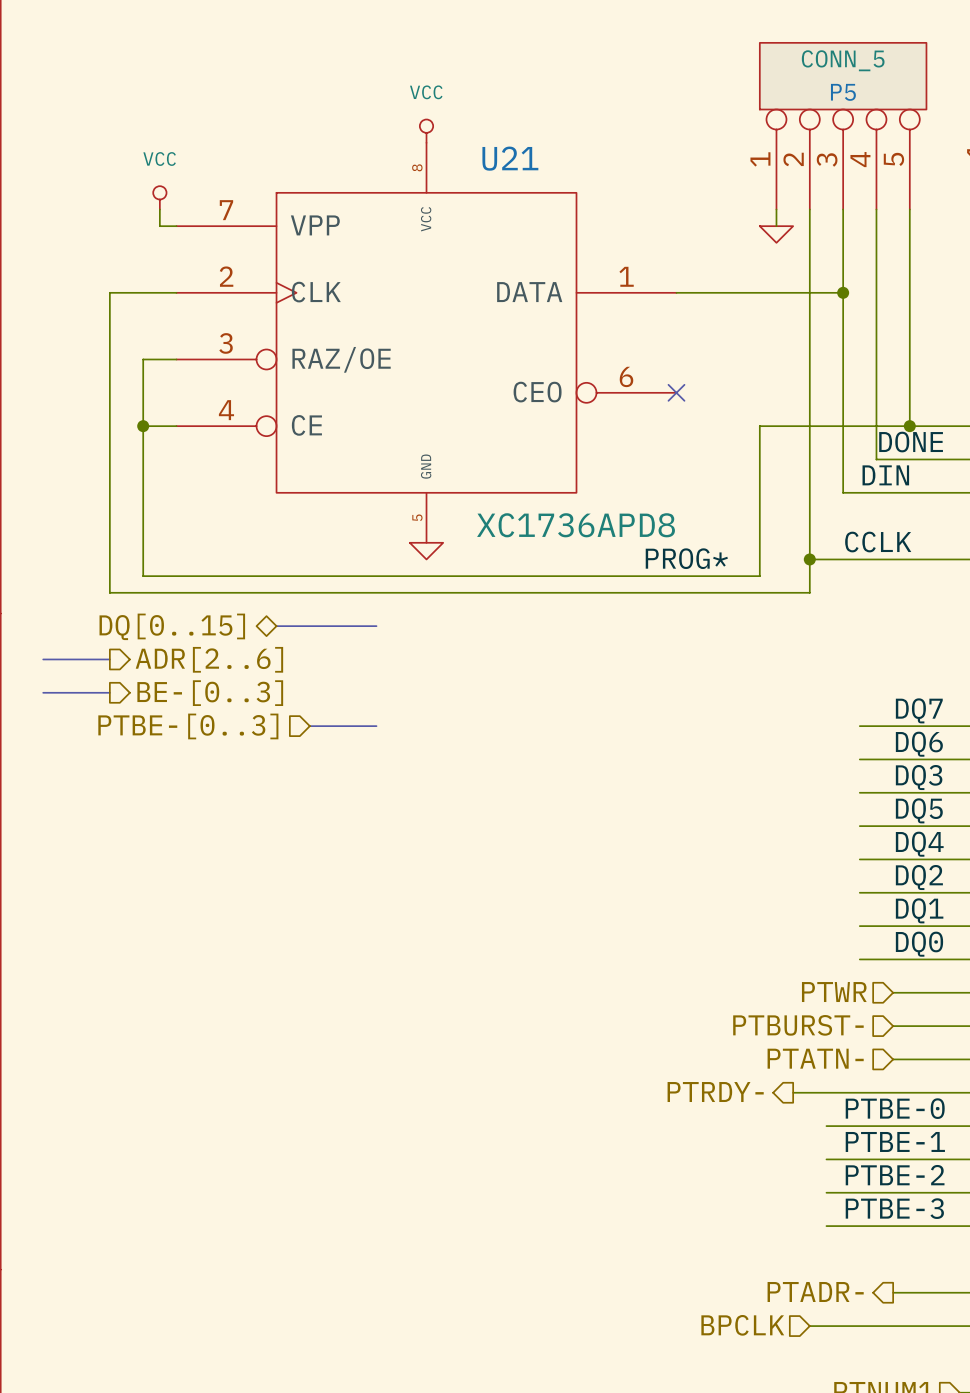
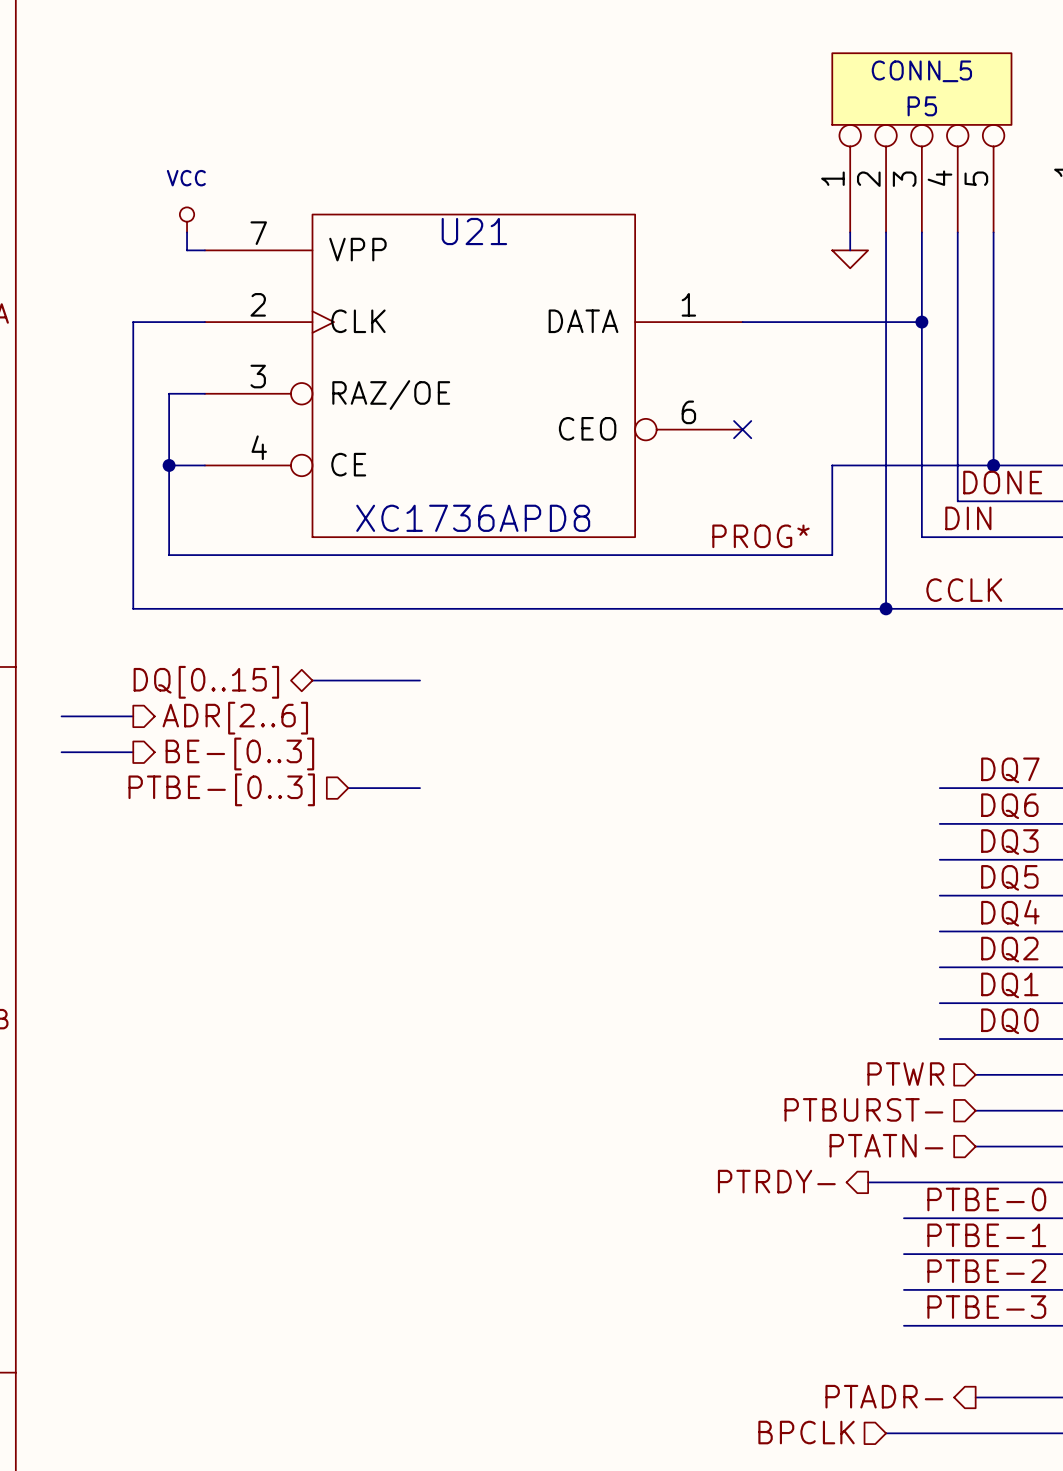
power symbol: VCC (426, 131) -> none
U21 symbol: [176, 142, 677, 543] -> [204, 214, 743, 538]
U21 name position: U21 (510, 158) -> U21 (474, 231)
wire: (143, 509) (143, 576) (759, 576) (759, 509) -> (169, 555) (832, 555)
U21 value position: XC1736APD8 (576, 525) -> XC1736APD8 (473, 518)
power symbol: (426, 551) -> none
label position: PROG* (686, 558) -> PROG* (760, 536)
wire: (109, 559) (109, 592) (809, 592) (809, 559) -> (133, 608) (886, 608)

